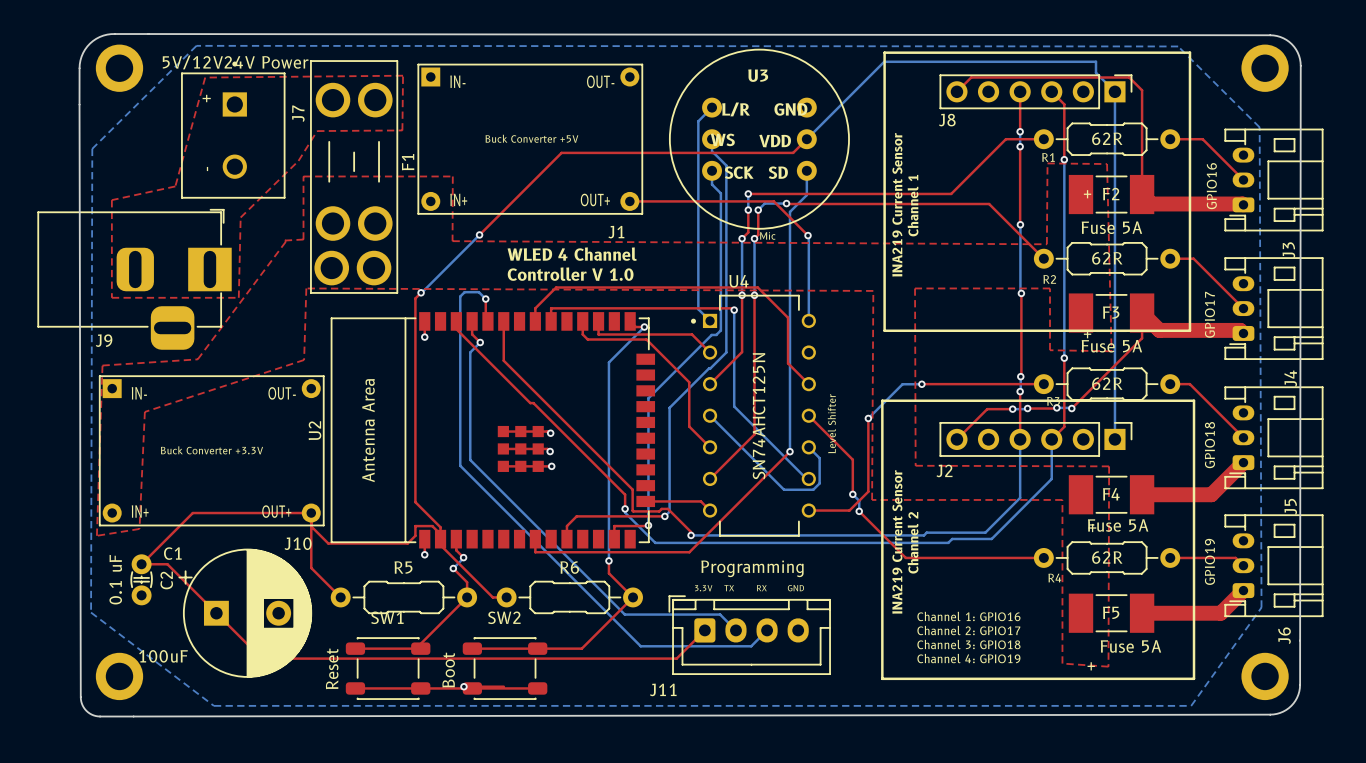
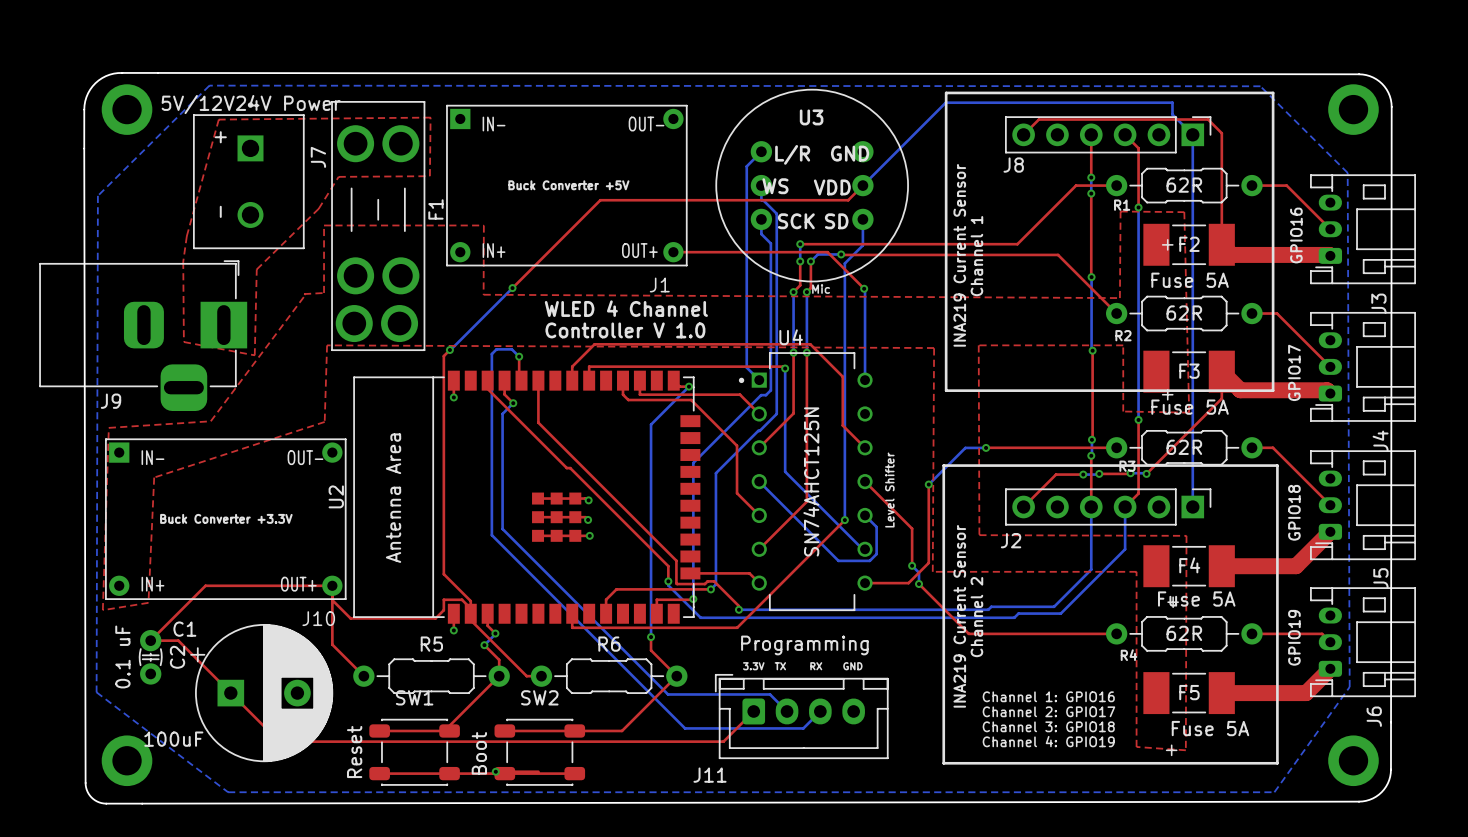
top zone outline: (175, 186) (111, 200) (111, 297) (238, 297) -> (186, 236) (183, 261) (183, 342) (254, 355)

